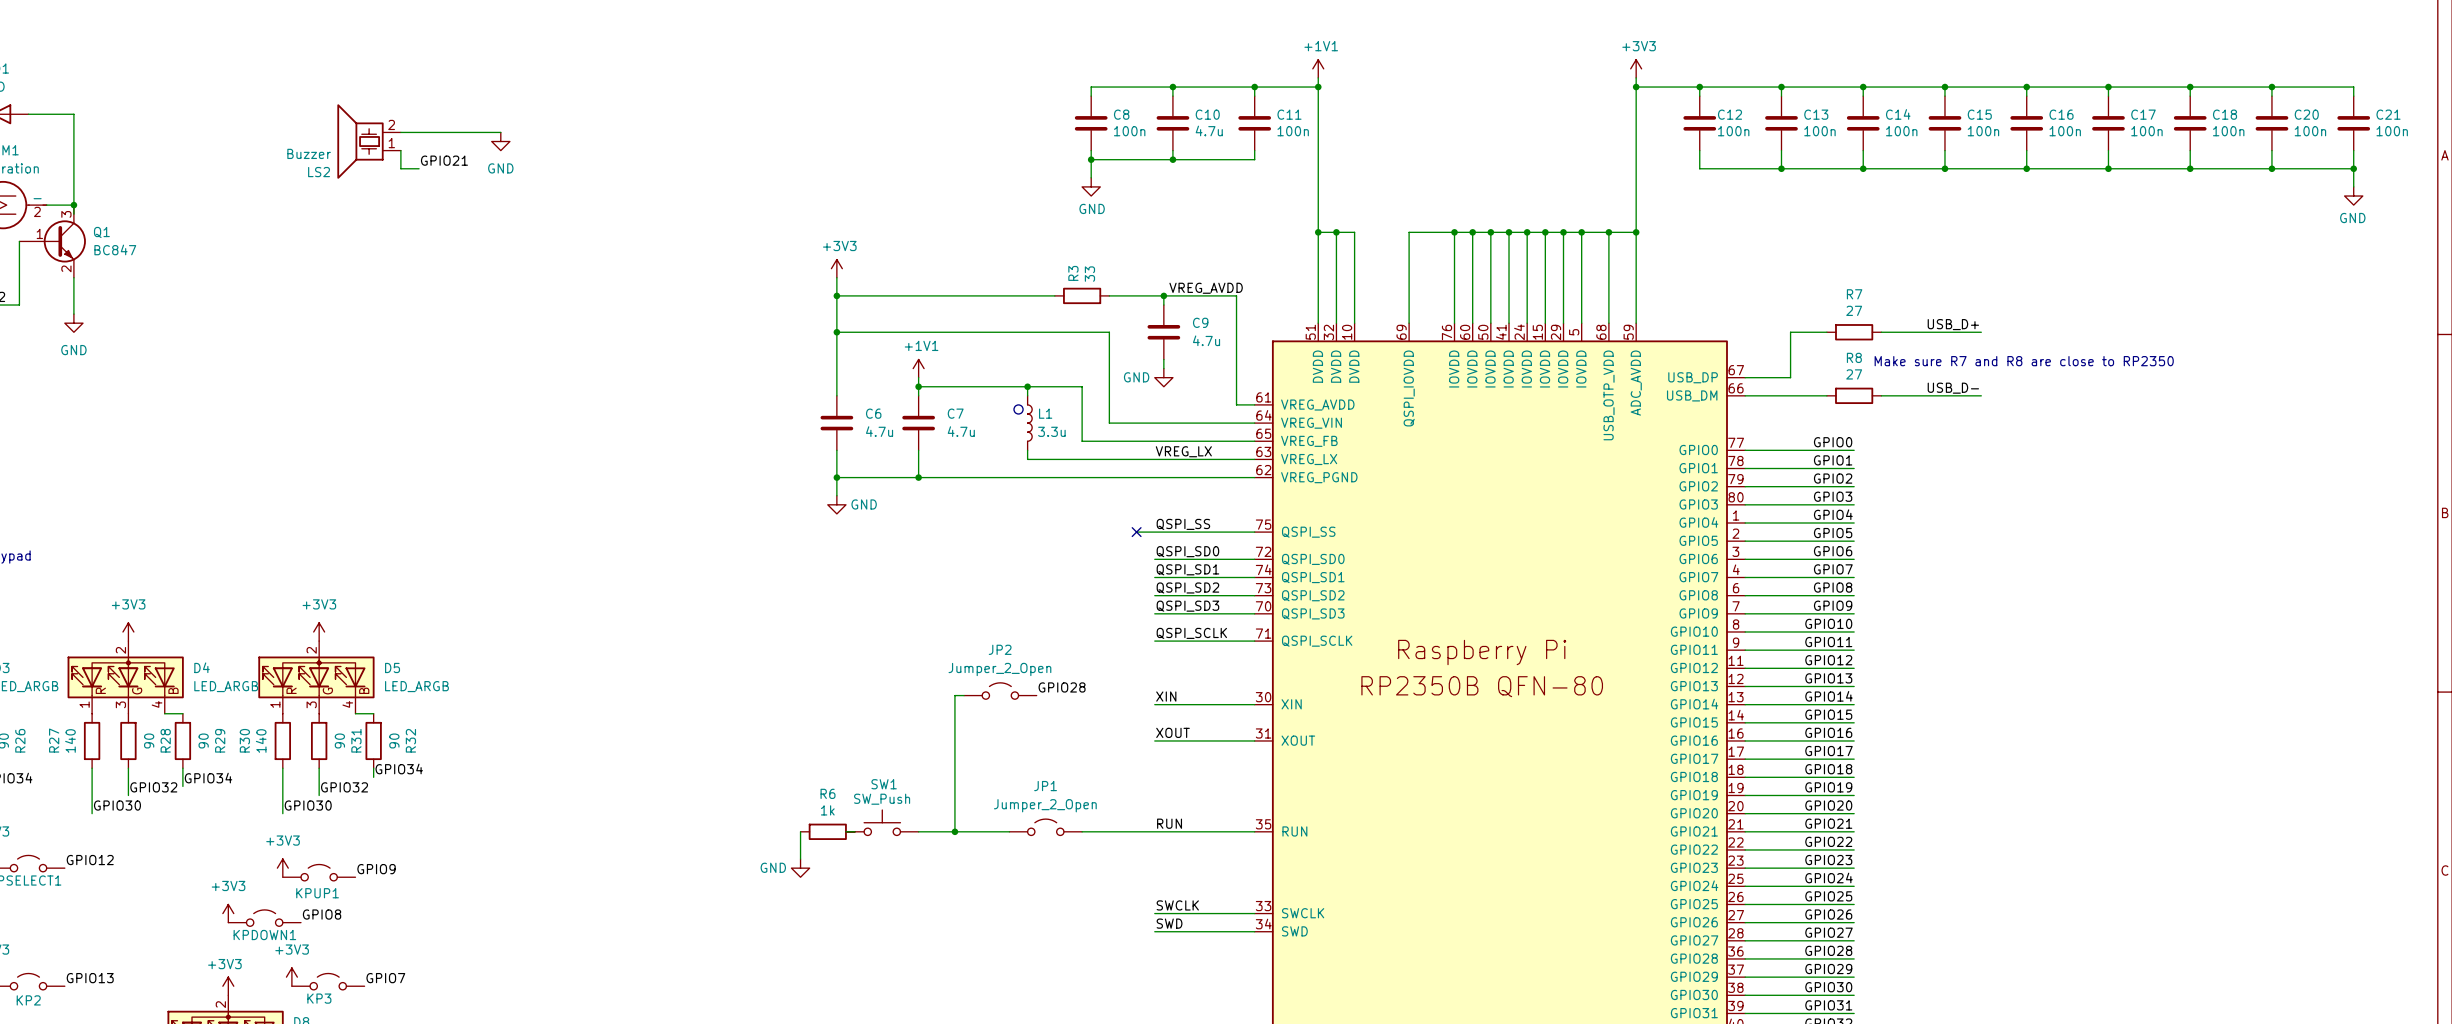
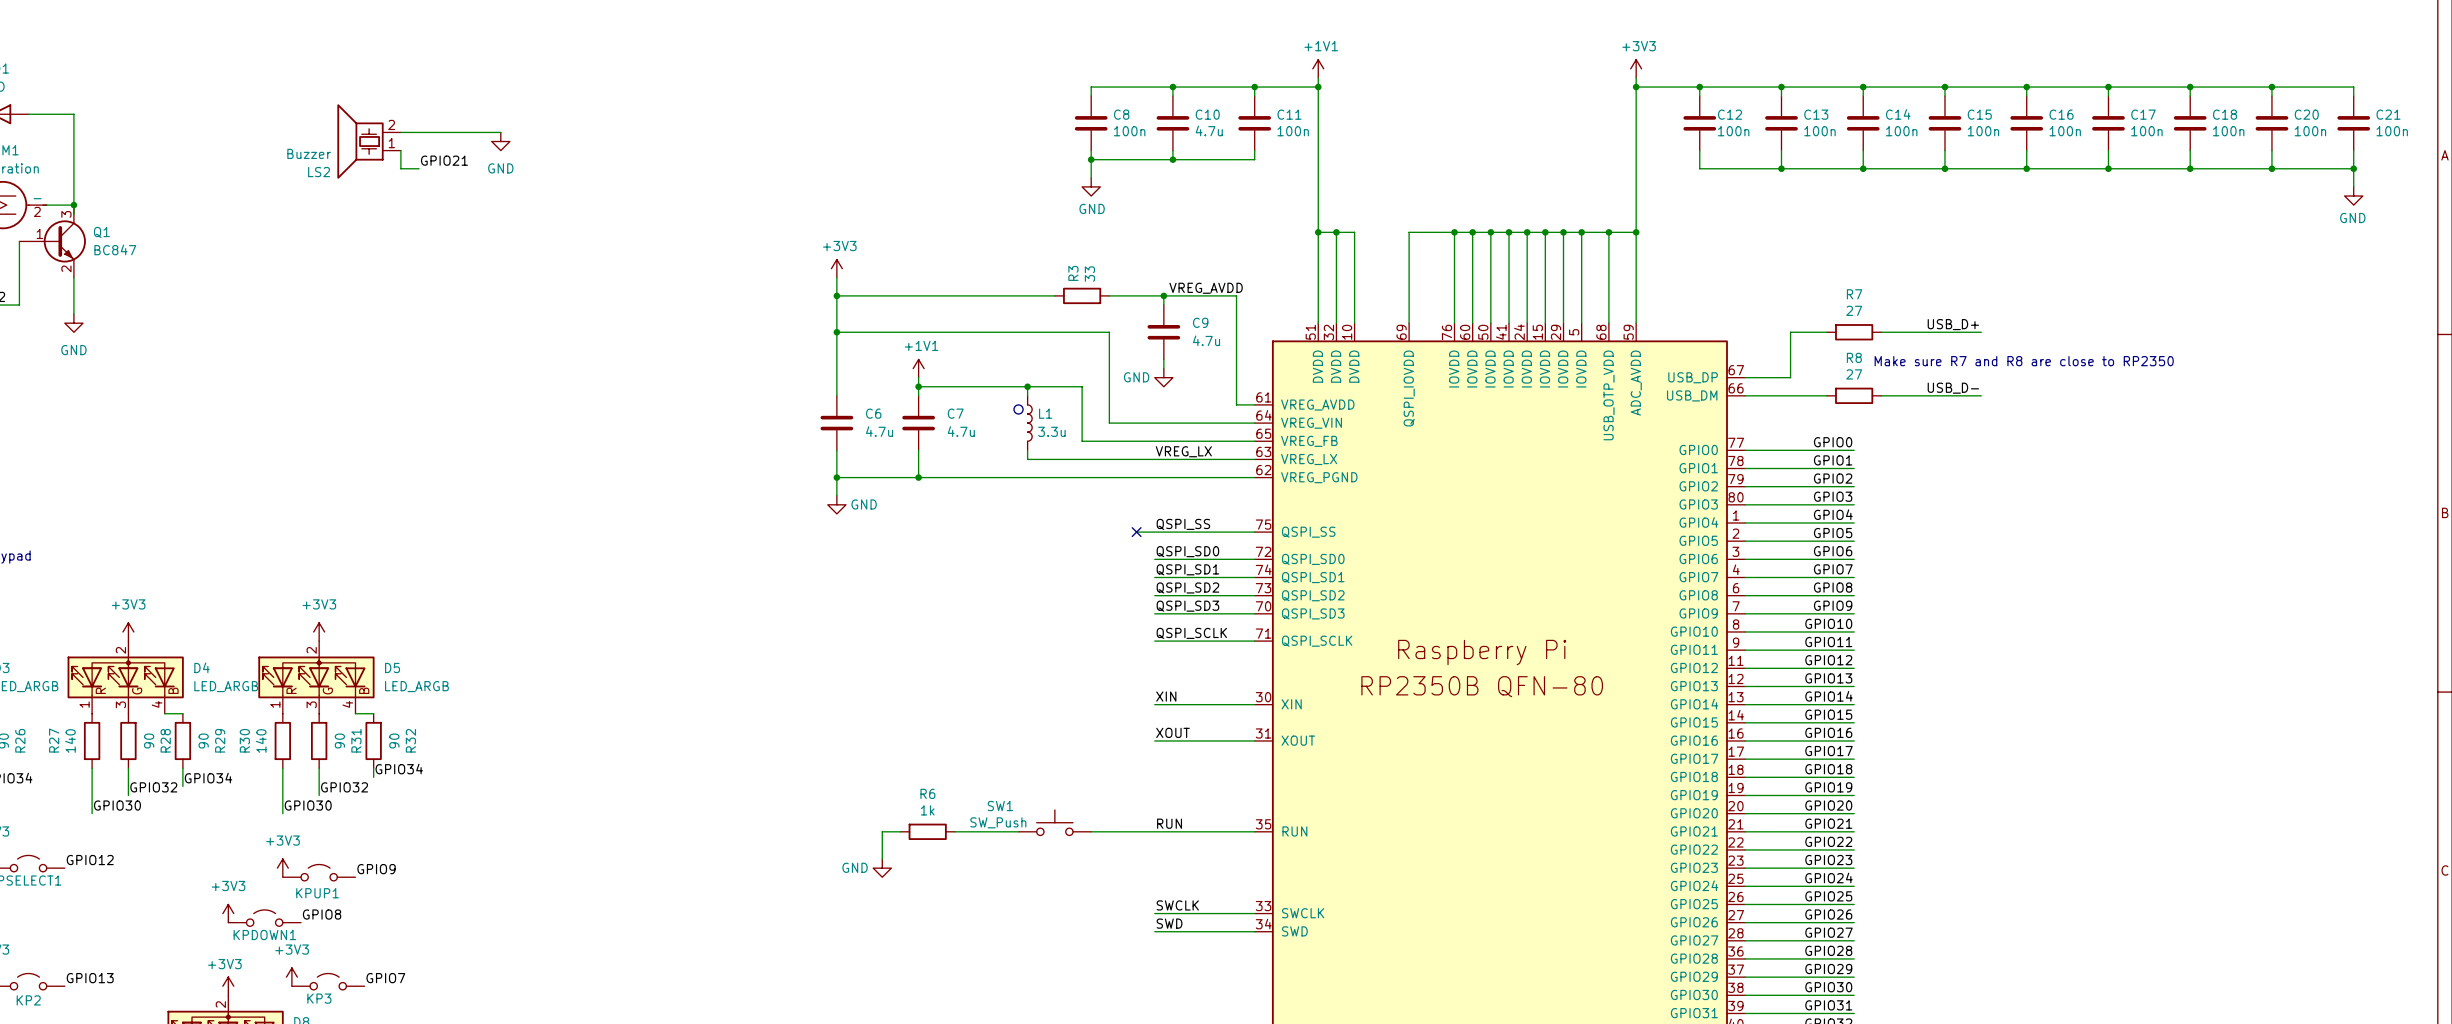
label: GPIO28 (1062, 687) -> none
JP2: Jumper_2_Open (1000, 691) -> none
wire: (964, 695) (954, 695) (954, 831) (918, 831) -> none
SW1 name position: SW1 (884, 784) -> SW1 (1000, 806)
SW1 value position: SW_Push (882, 799) -> SW_Push (998, 822)
SW1 position: (882, 822) -> (1054, 822)
JP1: Jumper_2_Open (1045, 827) -> none
wire: (800, 831) (800, 859) -> none
R6 position: (827, 831) -> (927, 831)
wire: (845, 831) (855, 831) -> none
wire: none -> (900, 831) (882, 831) (882, 859)
junction: (954, 831) -> none
power symbol position: GND (800, 868) -> GND (882, 868)

